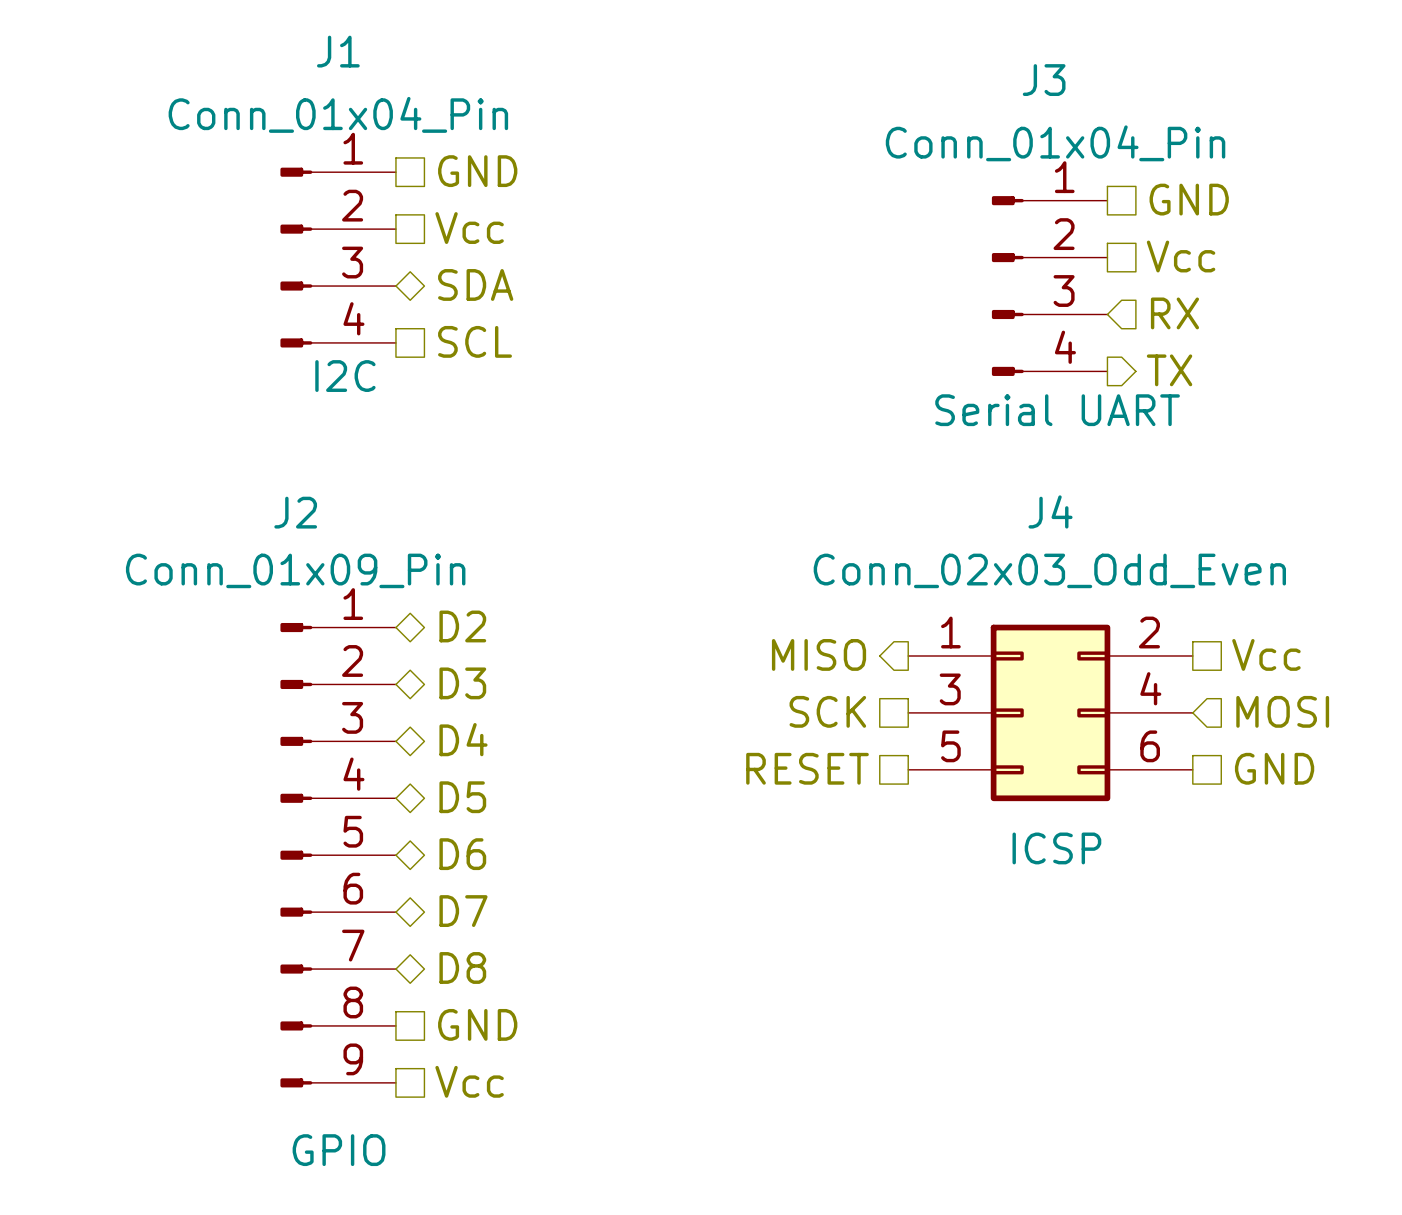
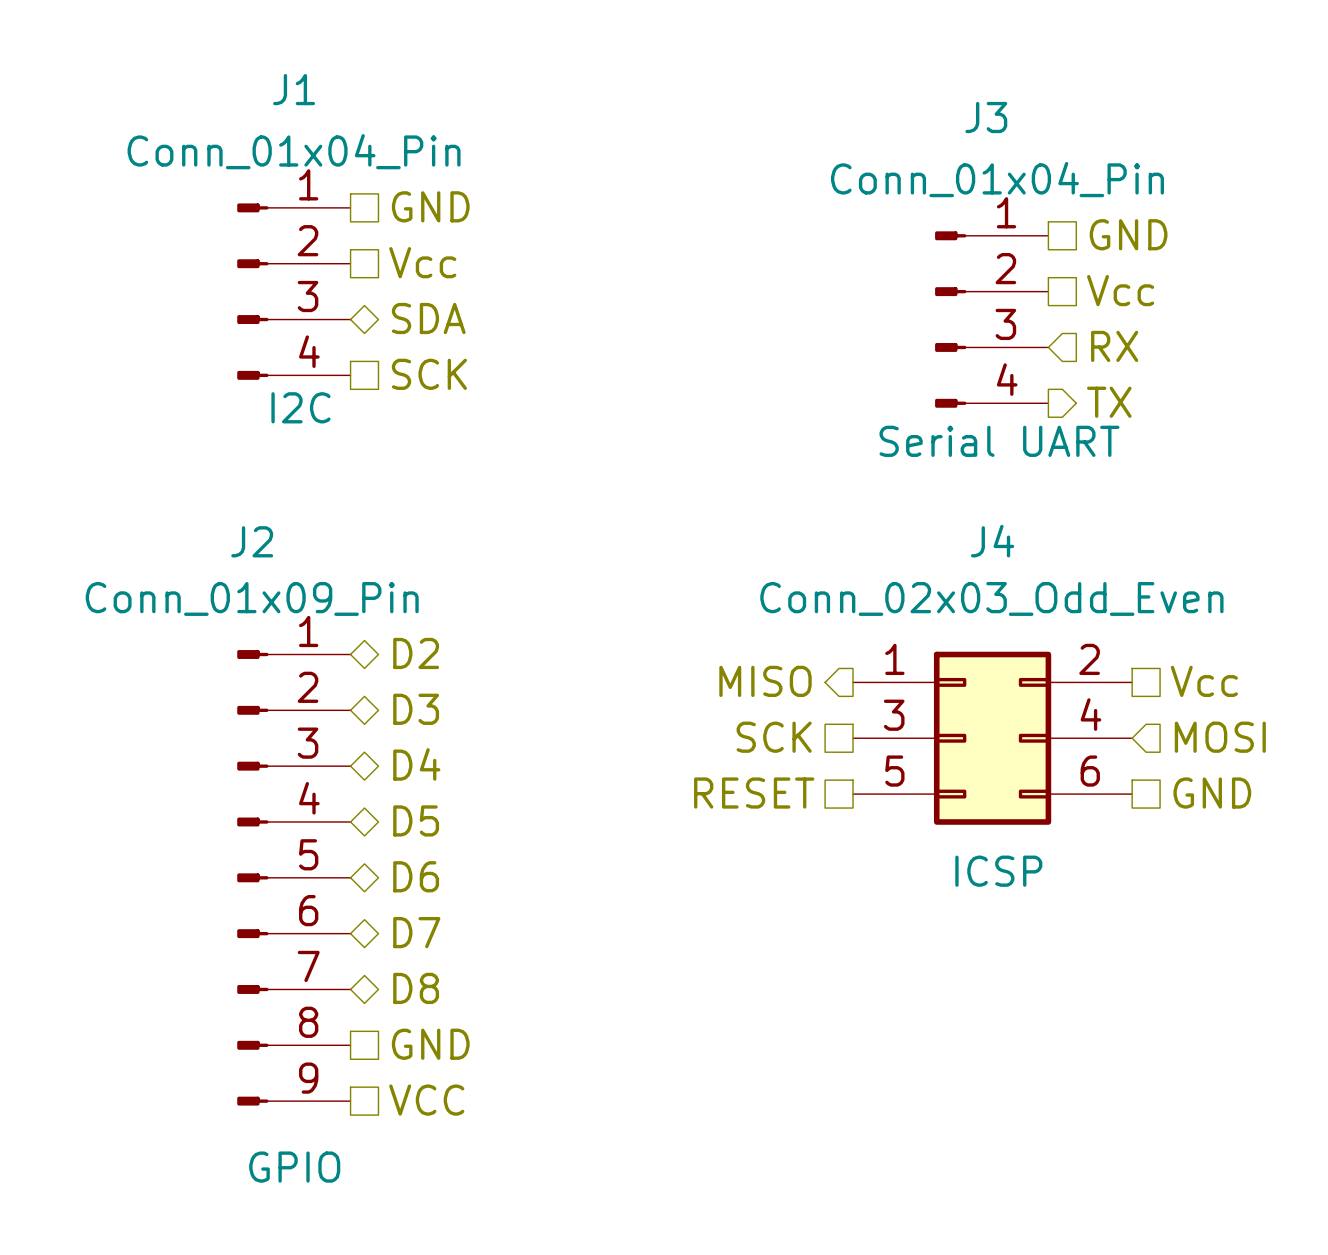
hierarchical label: SCL (475, 341) -> SCK (429, 374)
hierarchical label: Vcc (469, 1081) -> VCC (426, 1100)

